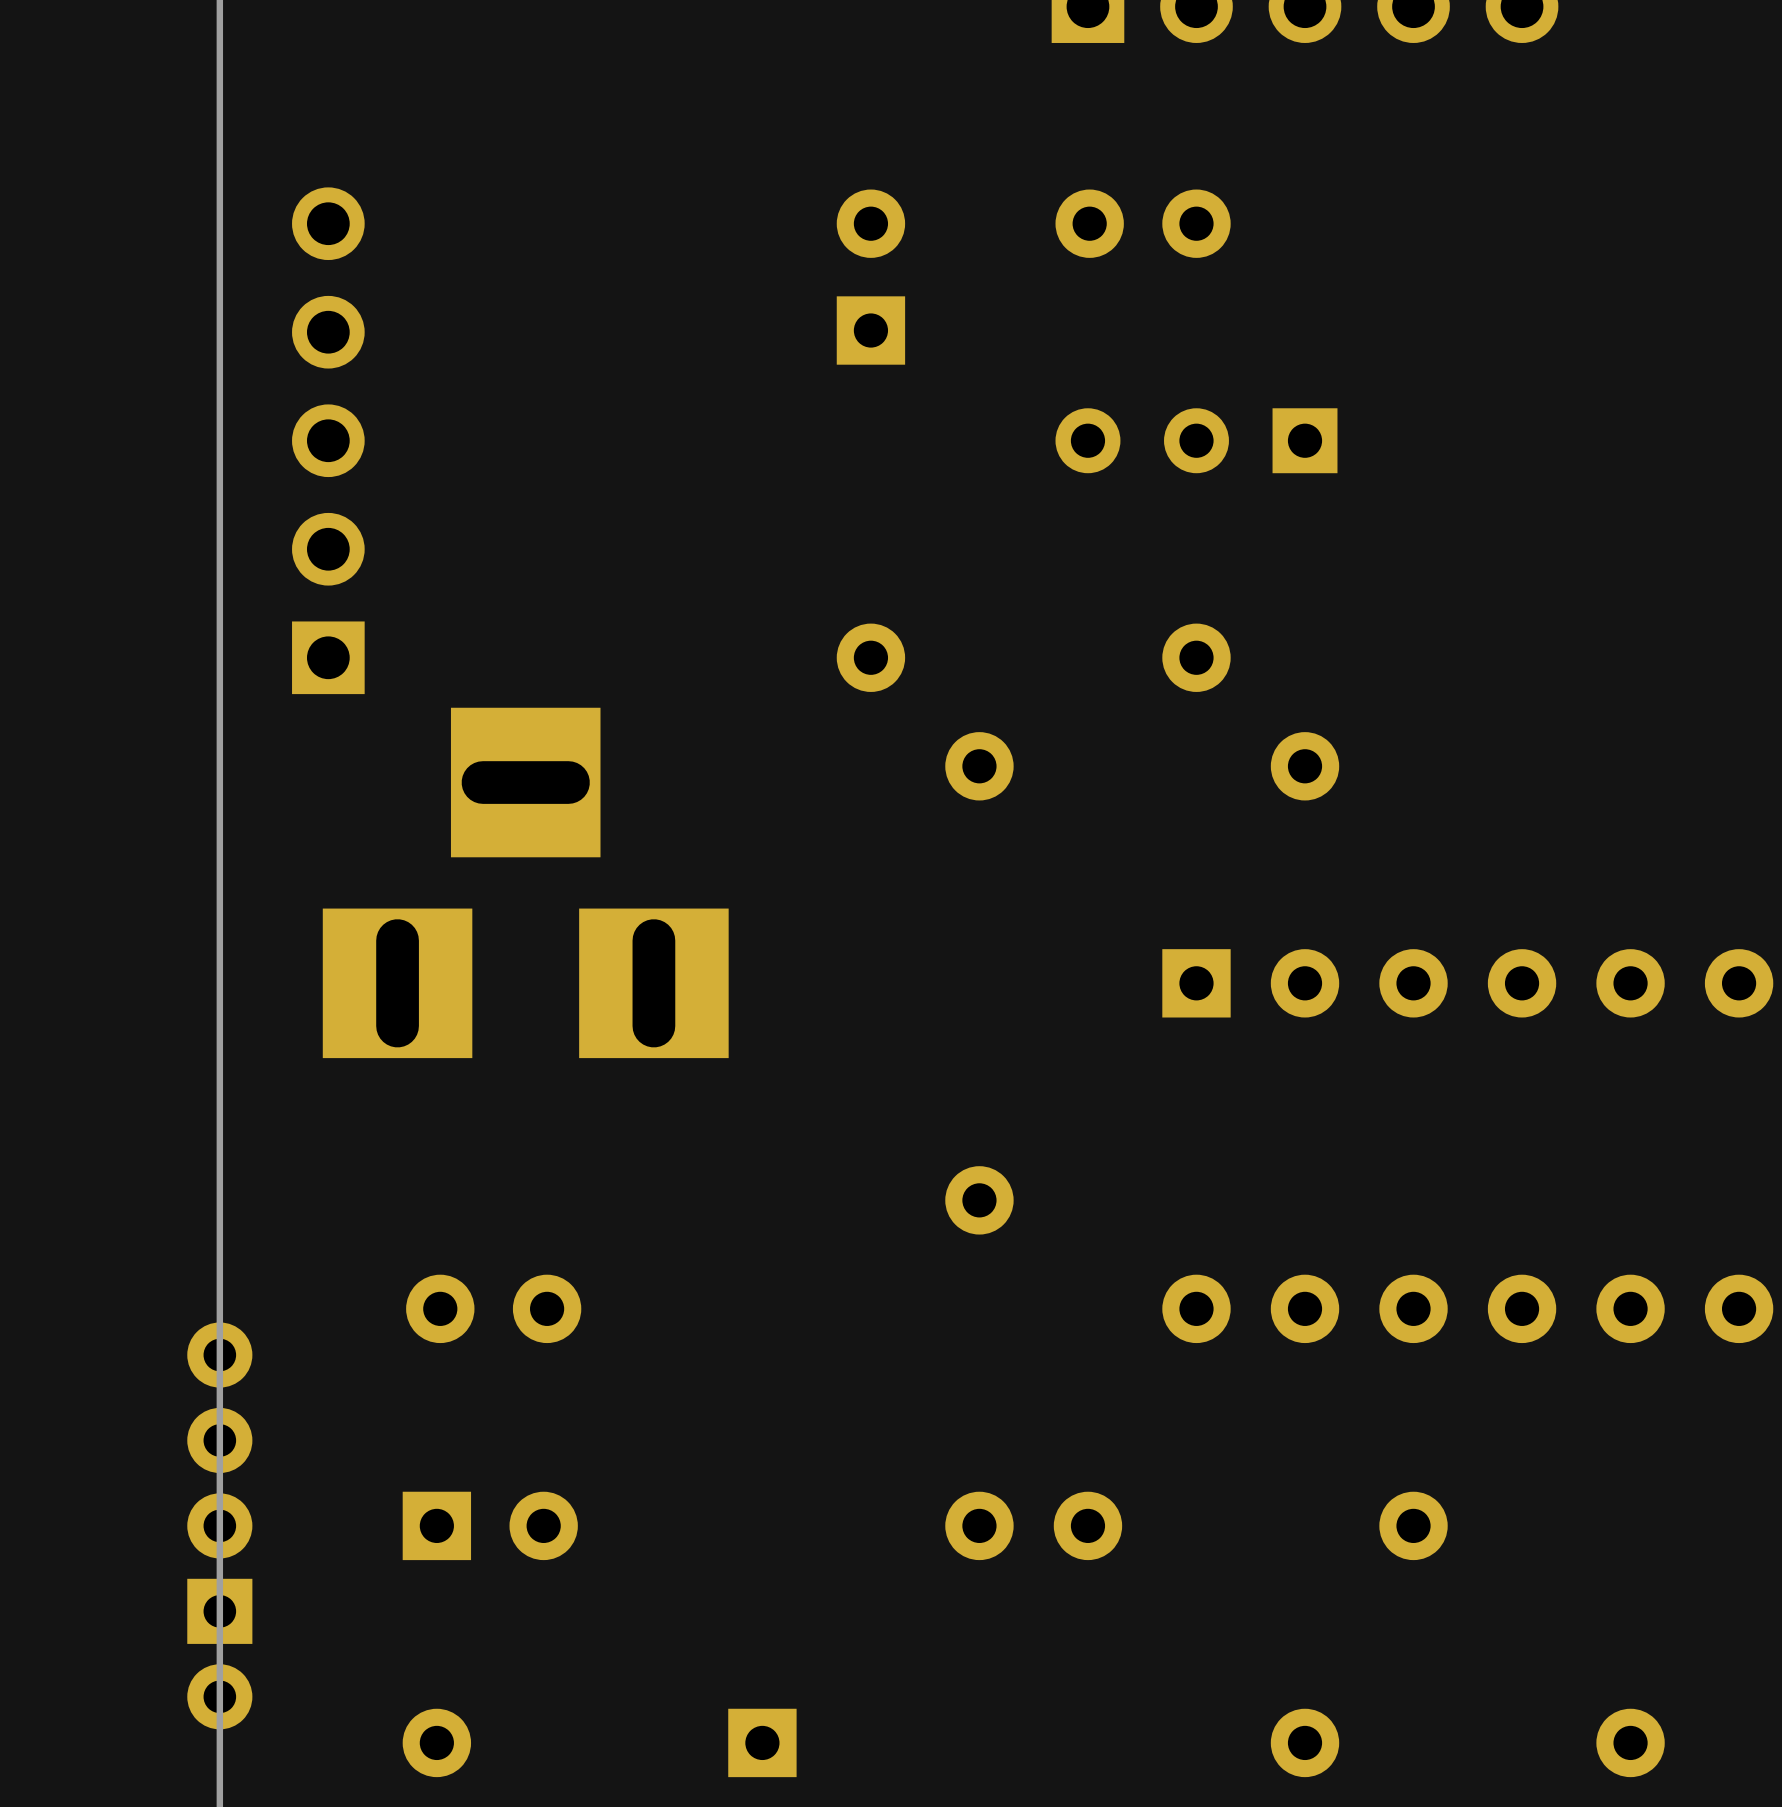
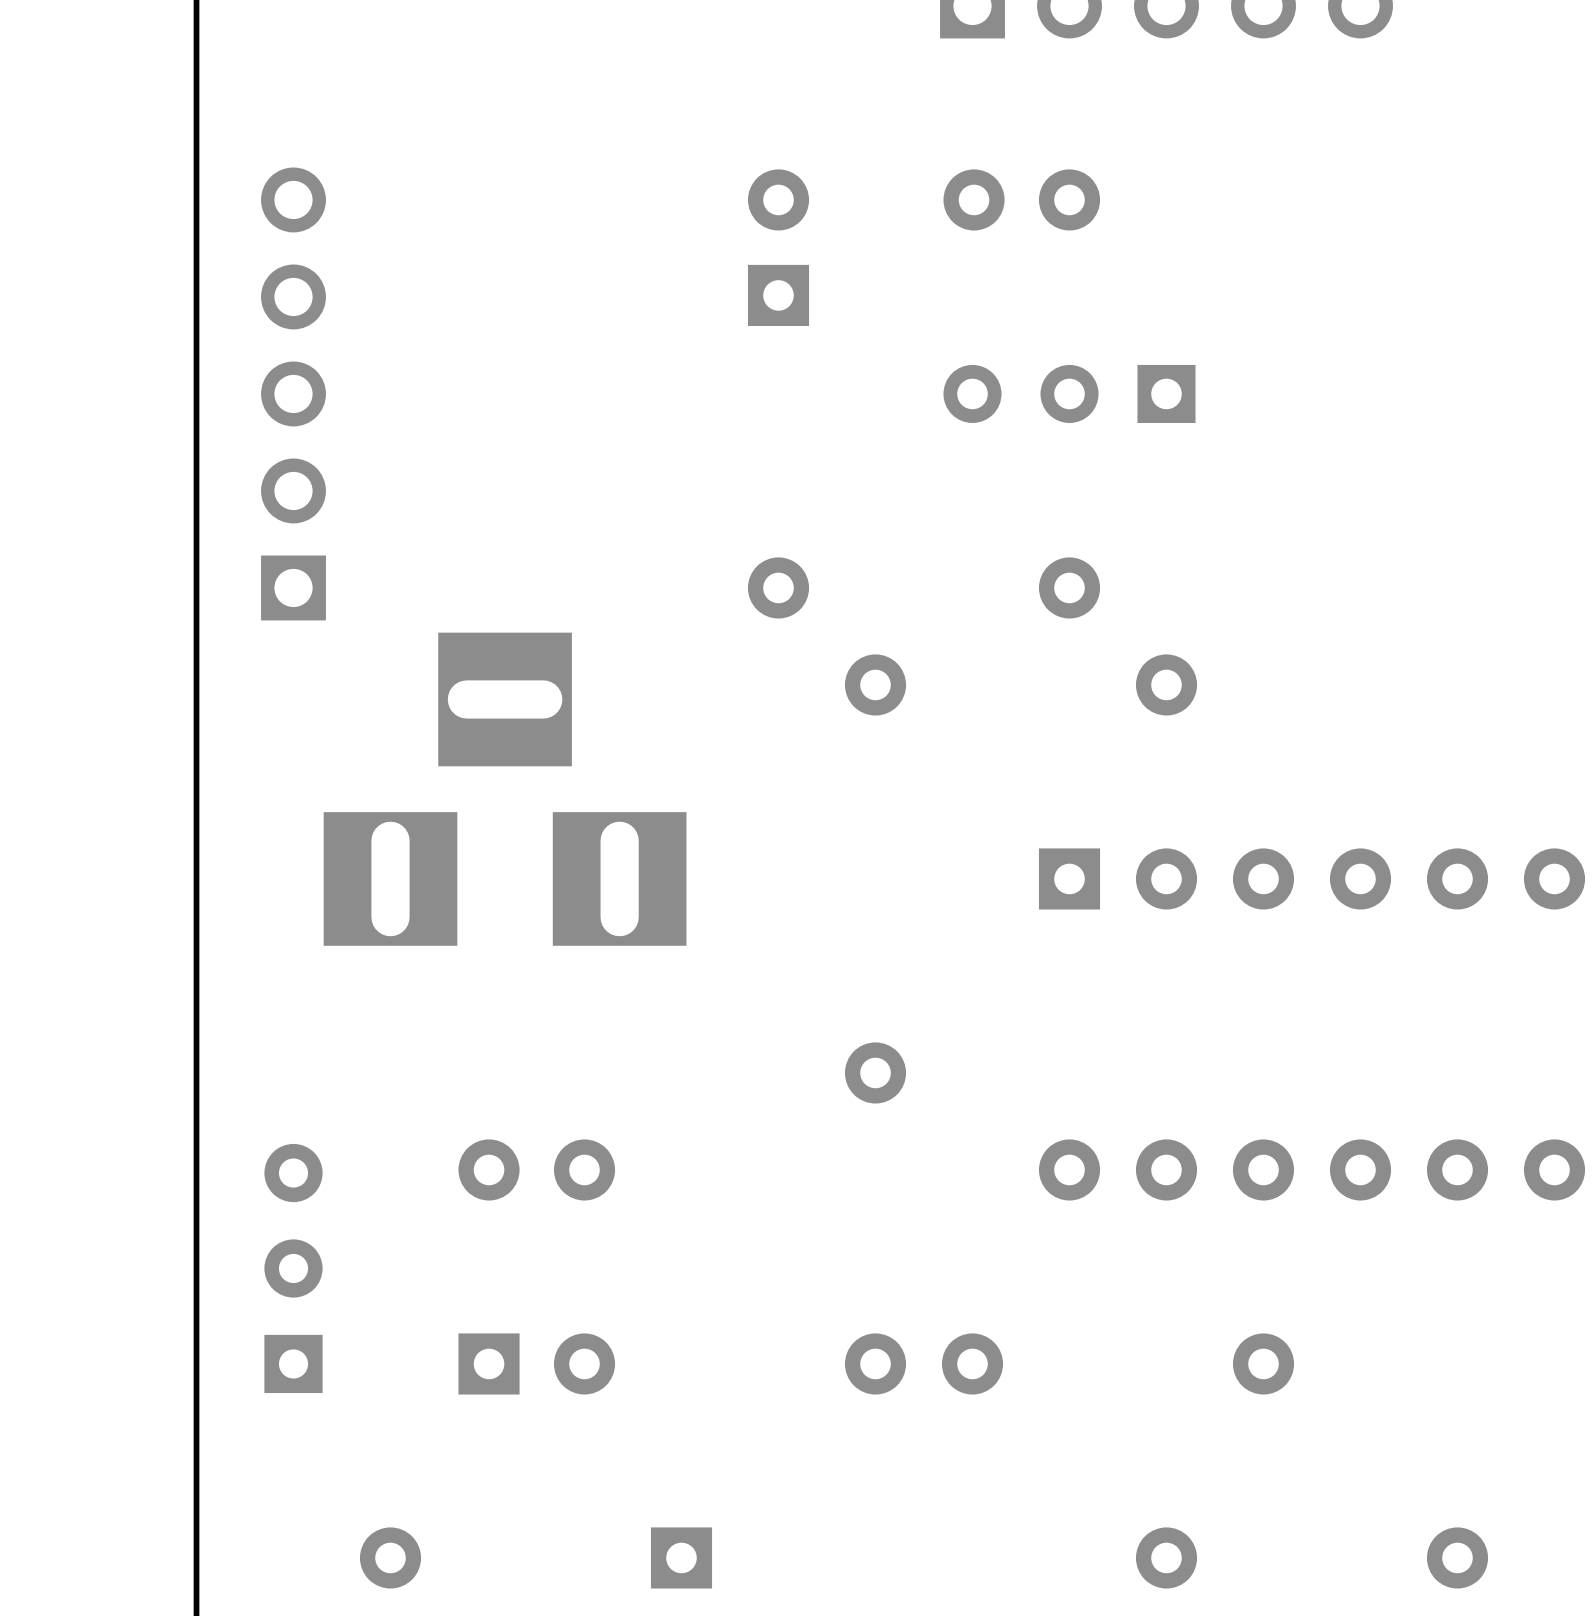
part position: (525, 882) -> (505, 789)
part position: (493, 1308) -> (536, 1169)
part: none -> (293, 1268)
part: (219, 1525) -> none
part position: (490, 1525) -> (536, 1363)

